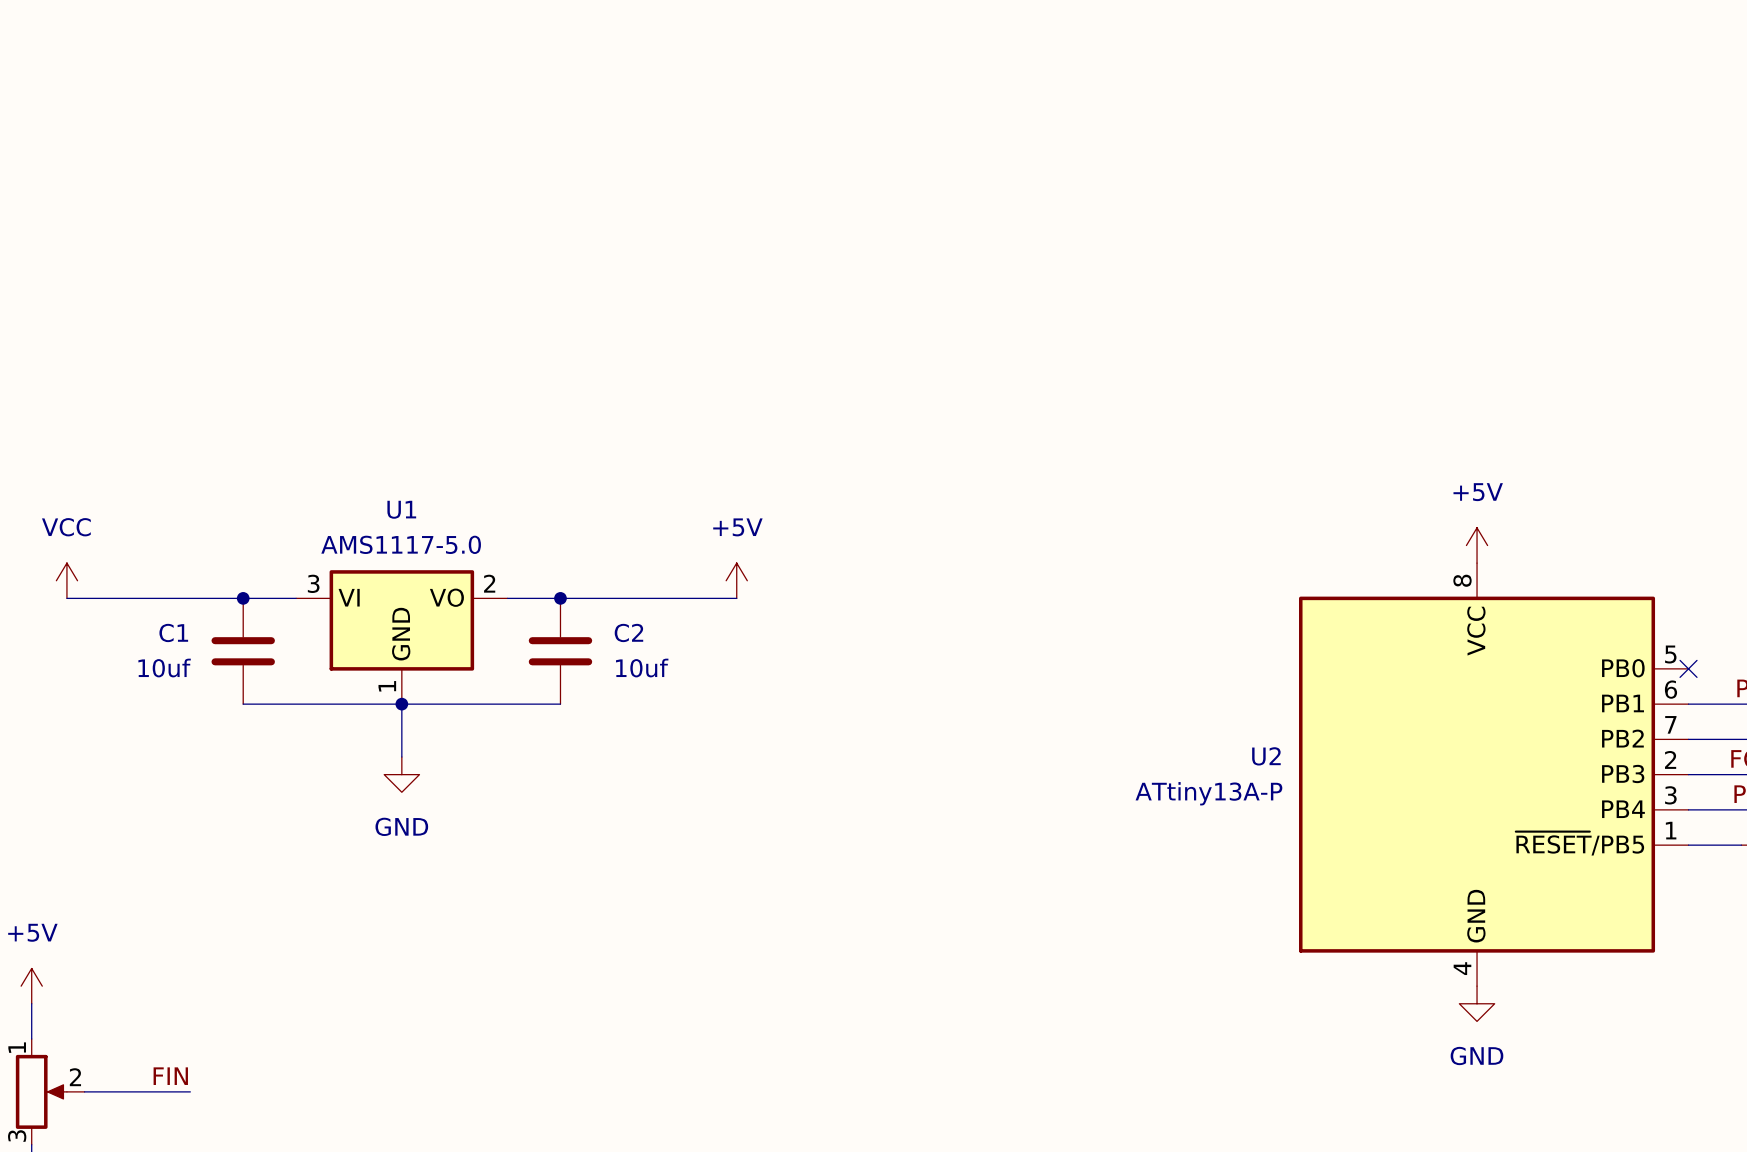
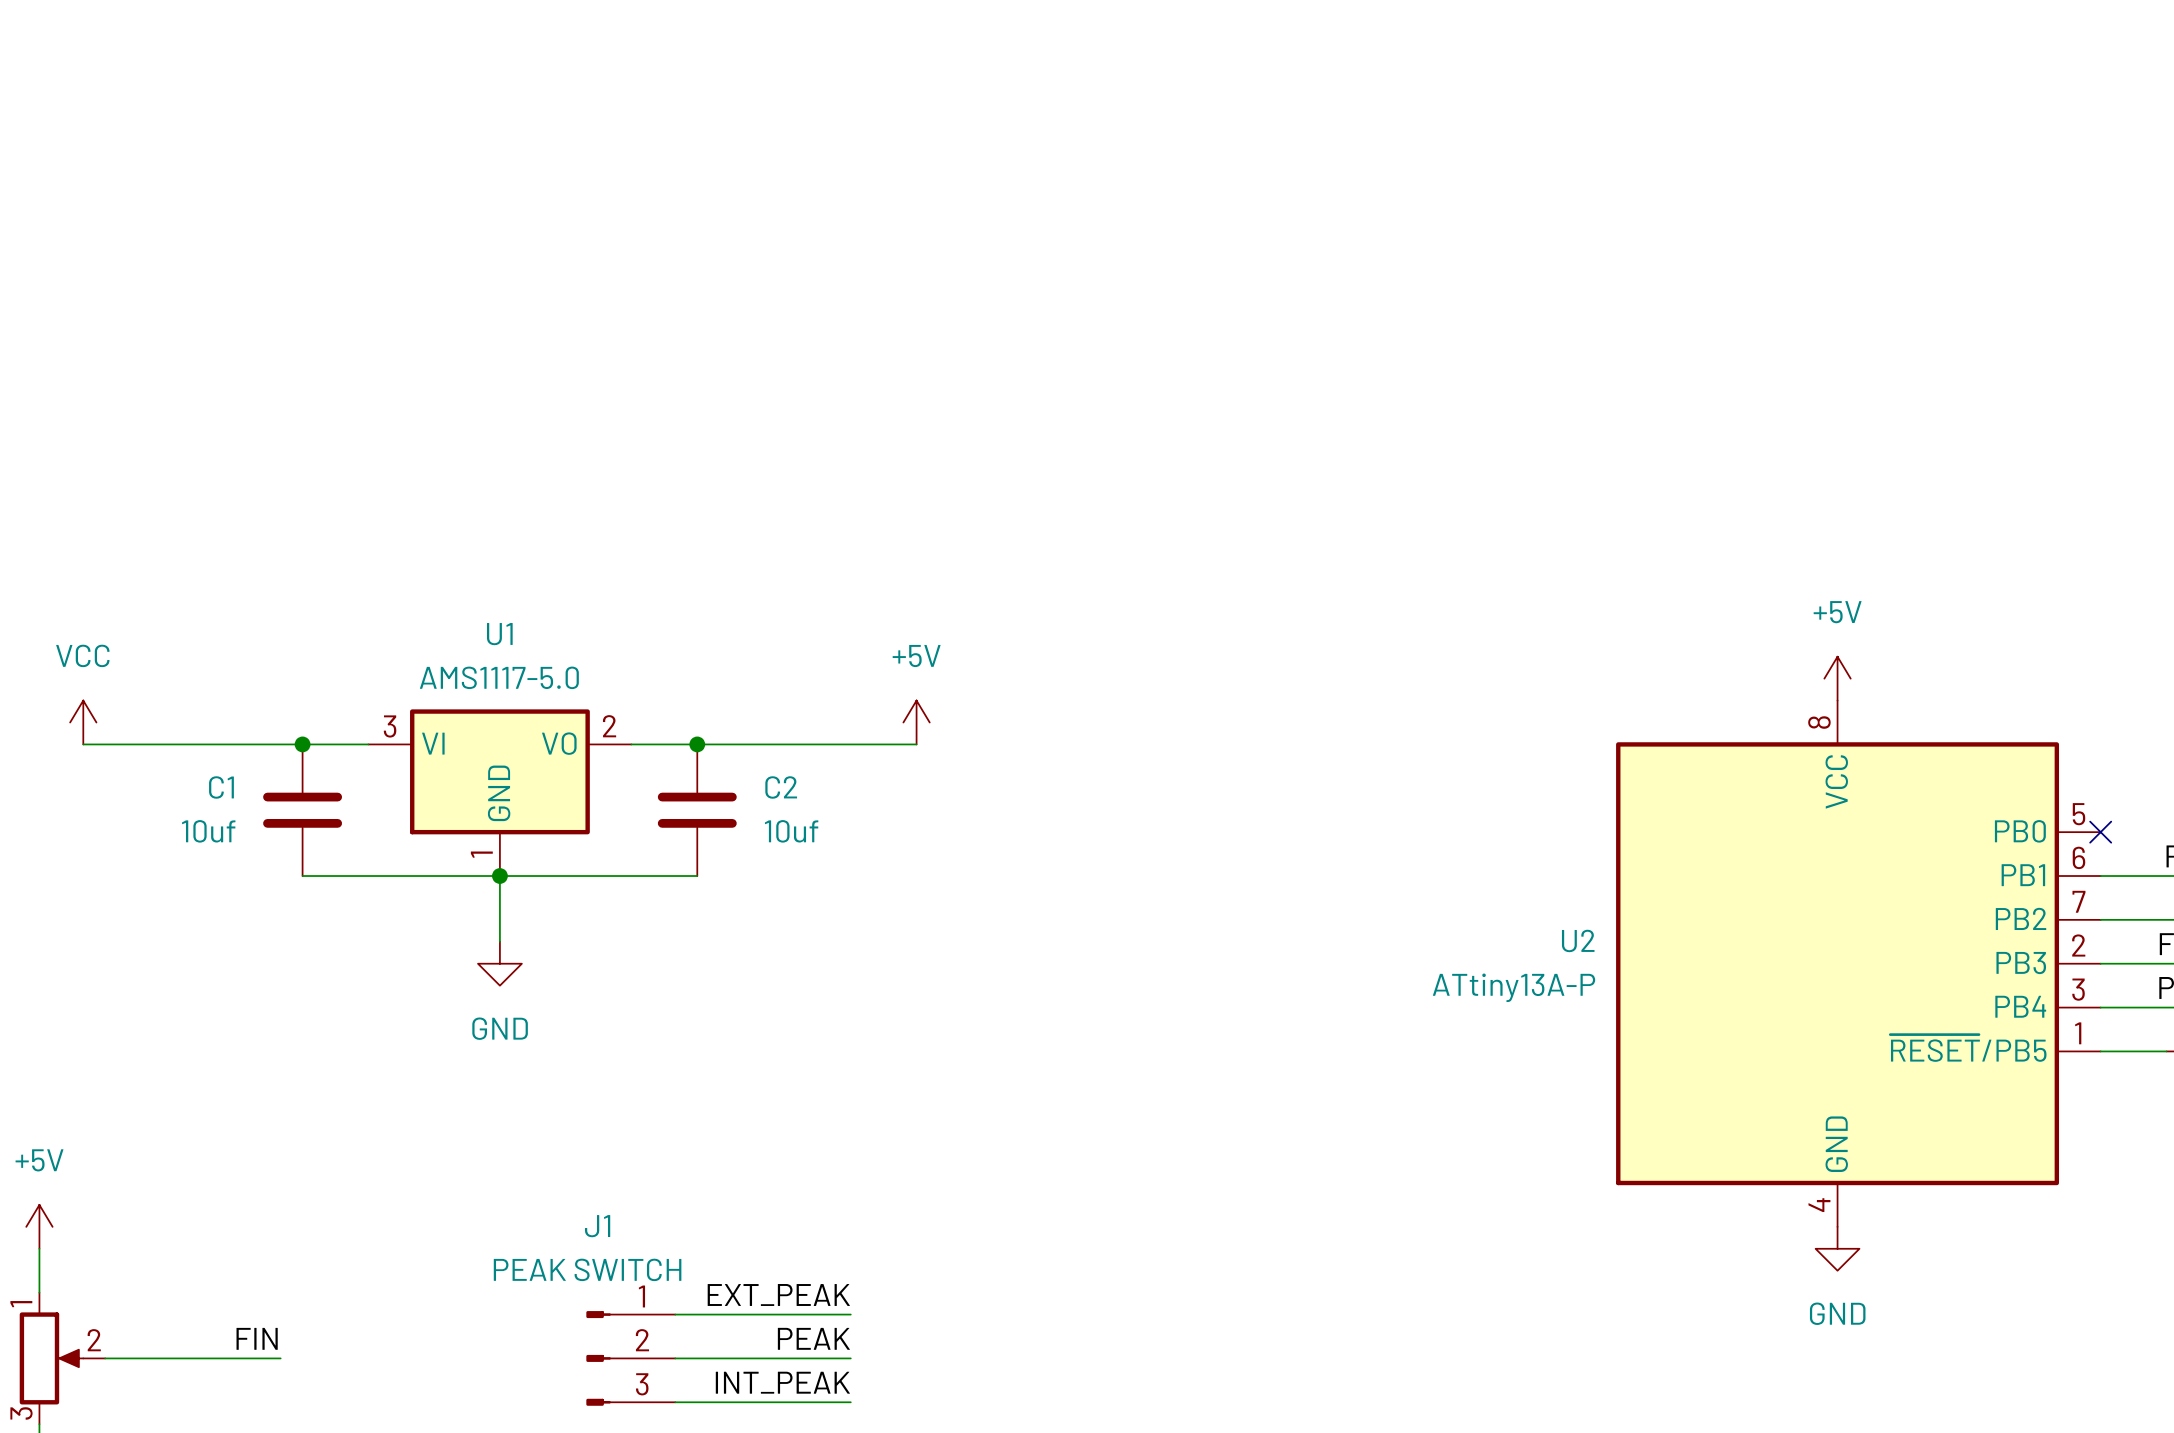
label: none -> EXT_PEAK (778, 1294)
wire: none -> (675, 1314) (850, 1314)
label position: FIN (170, 1076) -> FIN (257, 1338)
label: none -> PEAK (813, 1338)
wire: none -> (236, 1358) (280, 1358)
J1: none -> PEAK SWITCH (630, 1358)
wire: none -> (675, 1358) (850, 1358)
label: none -> INT_PEAK (782, 1382)
wire: none -> (675, 1402) (850, 1402)

